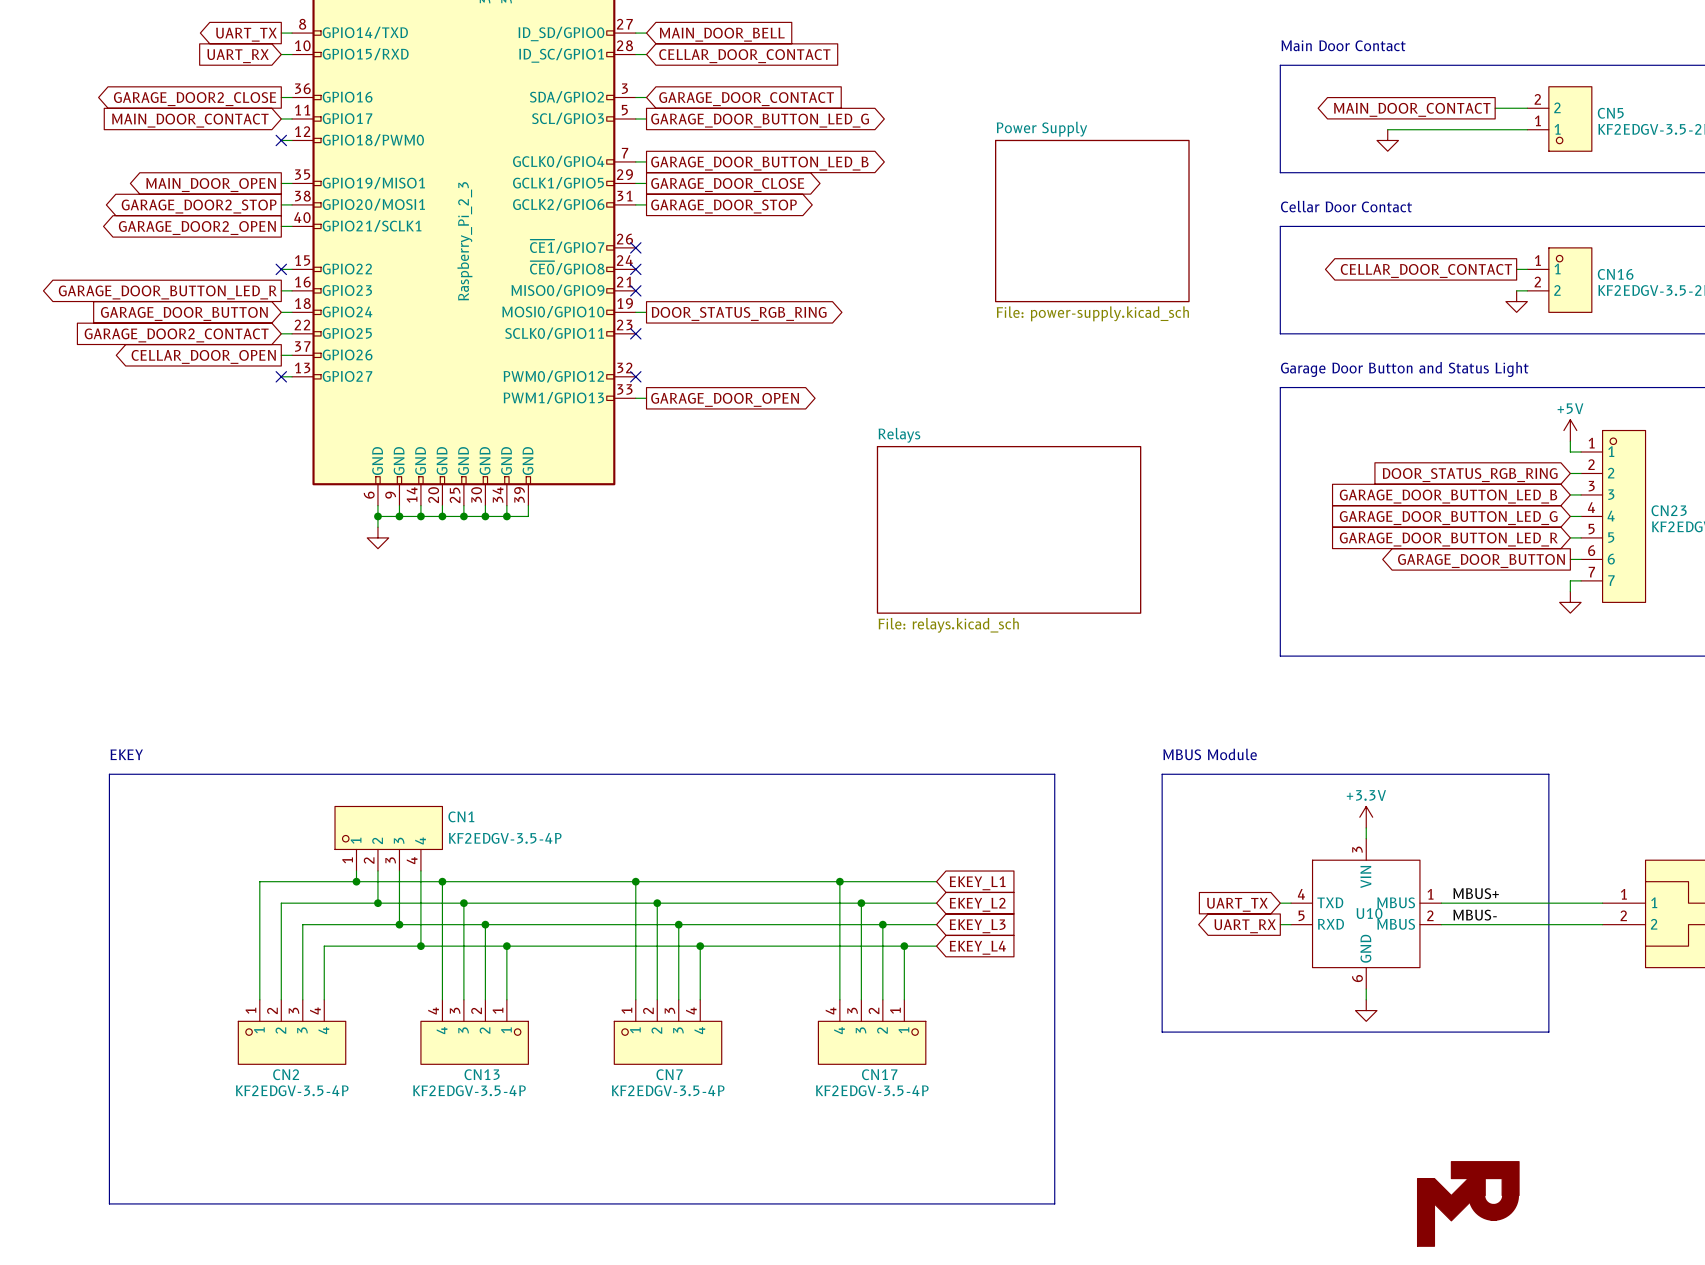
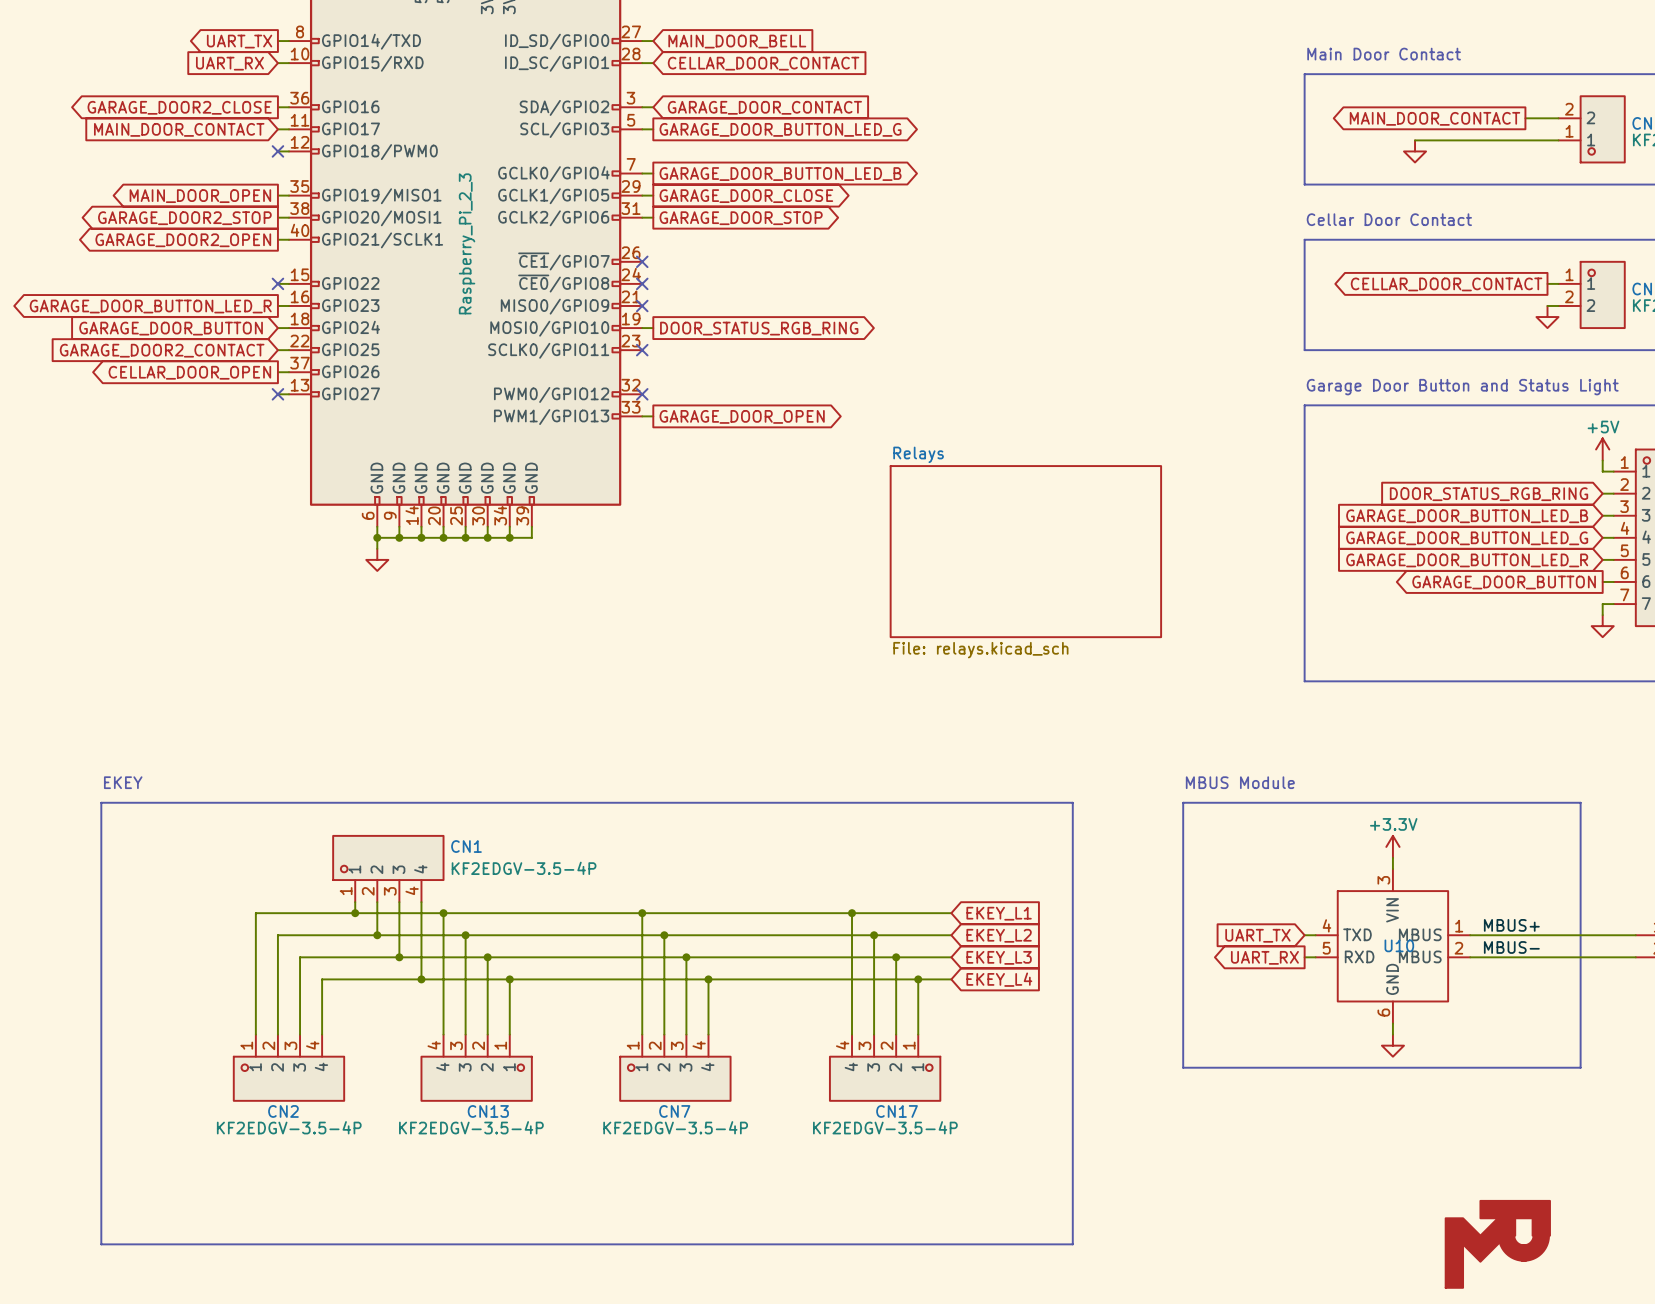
sheet Power Supply: File: power-supply.kicad_sch (1092, 221) -> none

